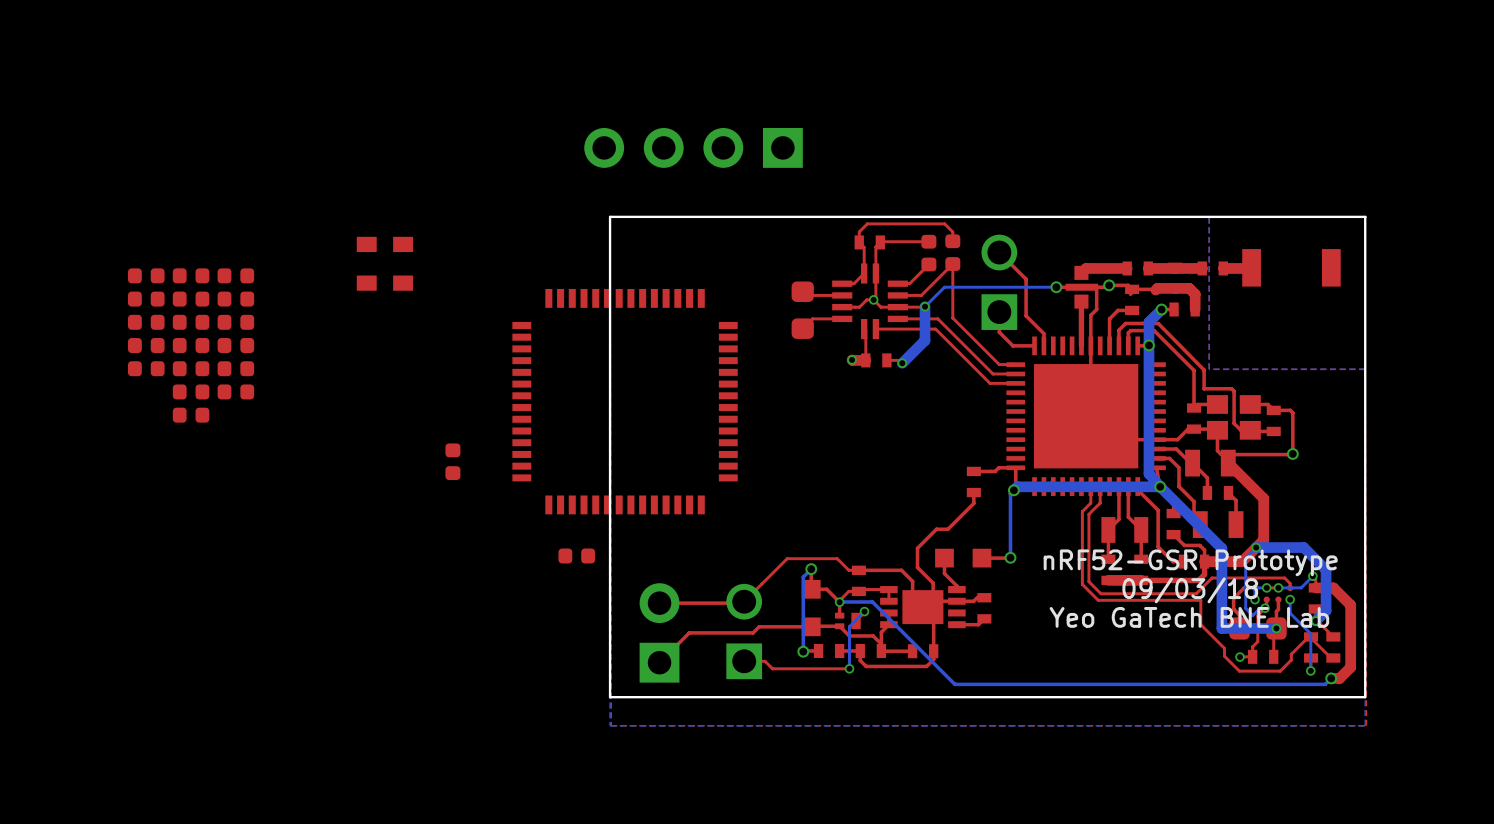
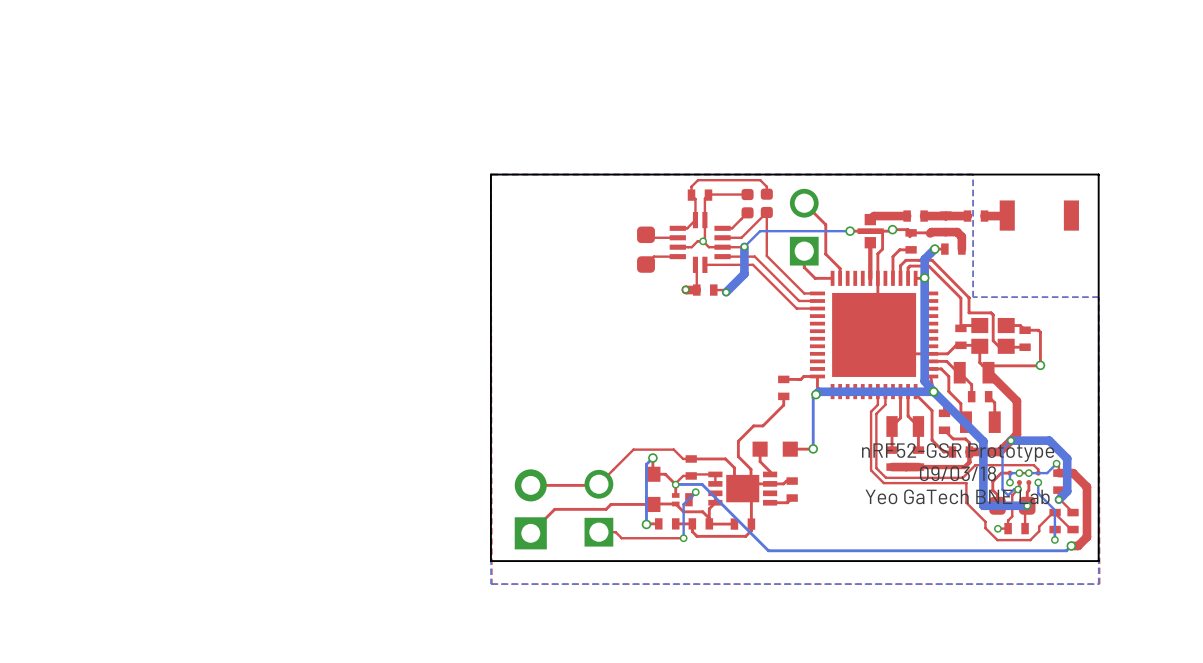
part: (693, 147) -> none
part: (384, 263) -> none
part: (146, 275) -> none
part: (191, 275) -> none
part: (235, 275) -> none
part: (146, 299) -> none
part: (191, 299) -> none
part: (235, 299) -> none
part: (146, 322) -> none
part: (191, 322) -> none
part: (235, 322) -> none
part: (146, 345) -> none
part: (191, 345) -> none
part: (235, 345) -> none
part: (146, 368) -> none
part: (191, 368) -> none
part: (235, 368) -> none
part: (191, 391) -> none
part: (235, 391) -> none
part: (625, 401) -> none
part: (191, 415) -> none
part: (452, 461) -> none
part: (576, 555) -> none

